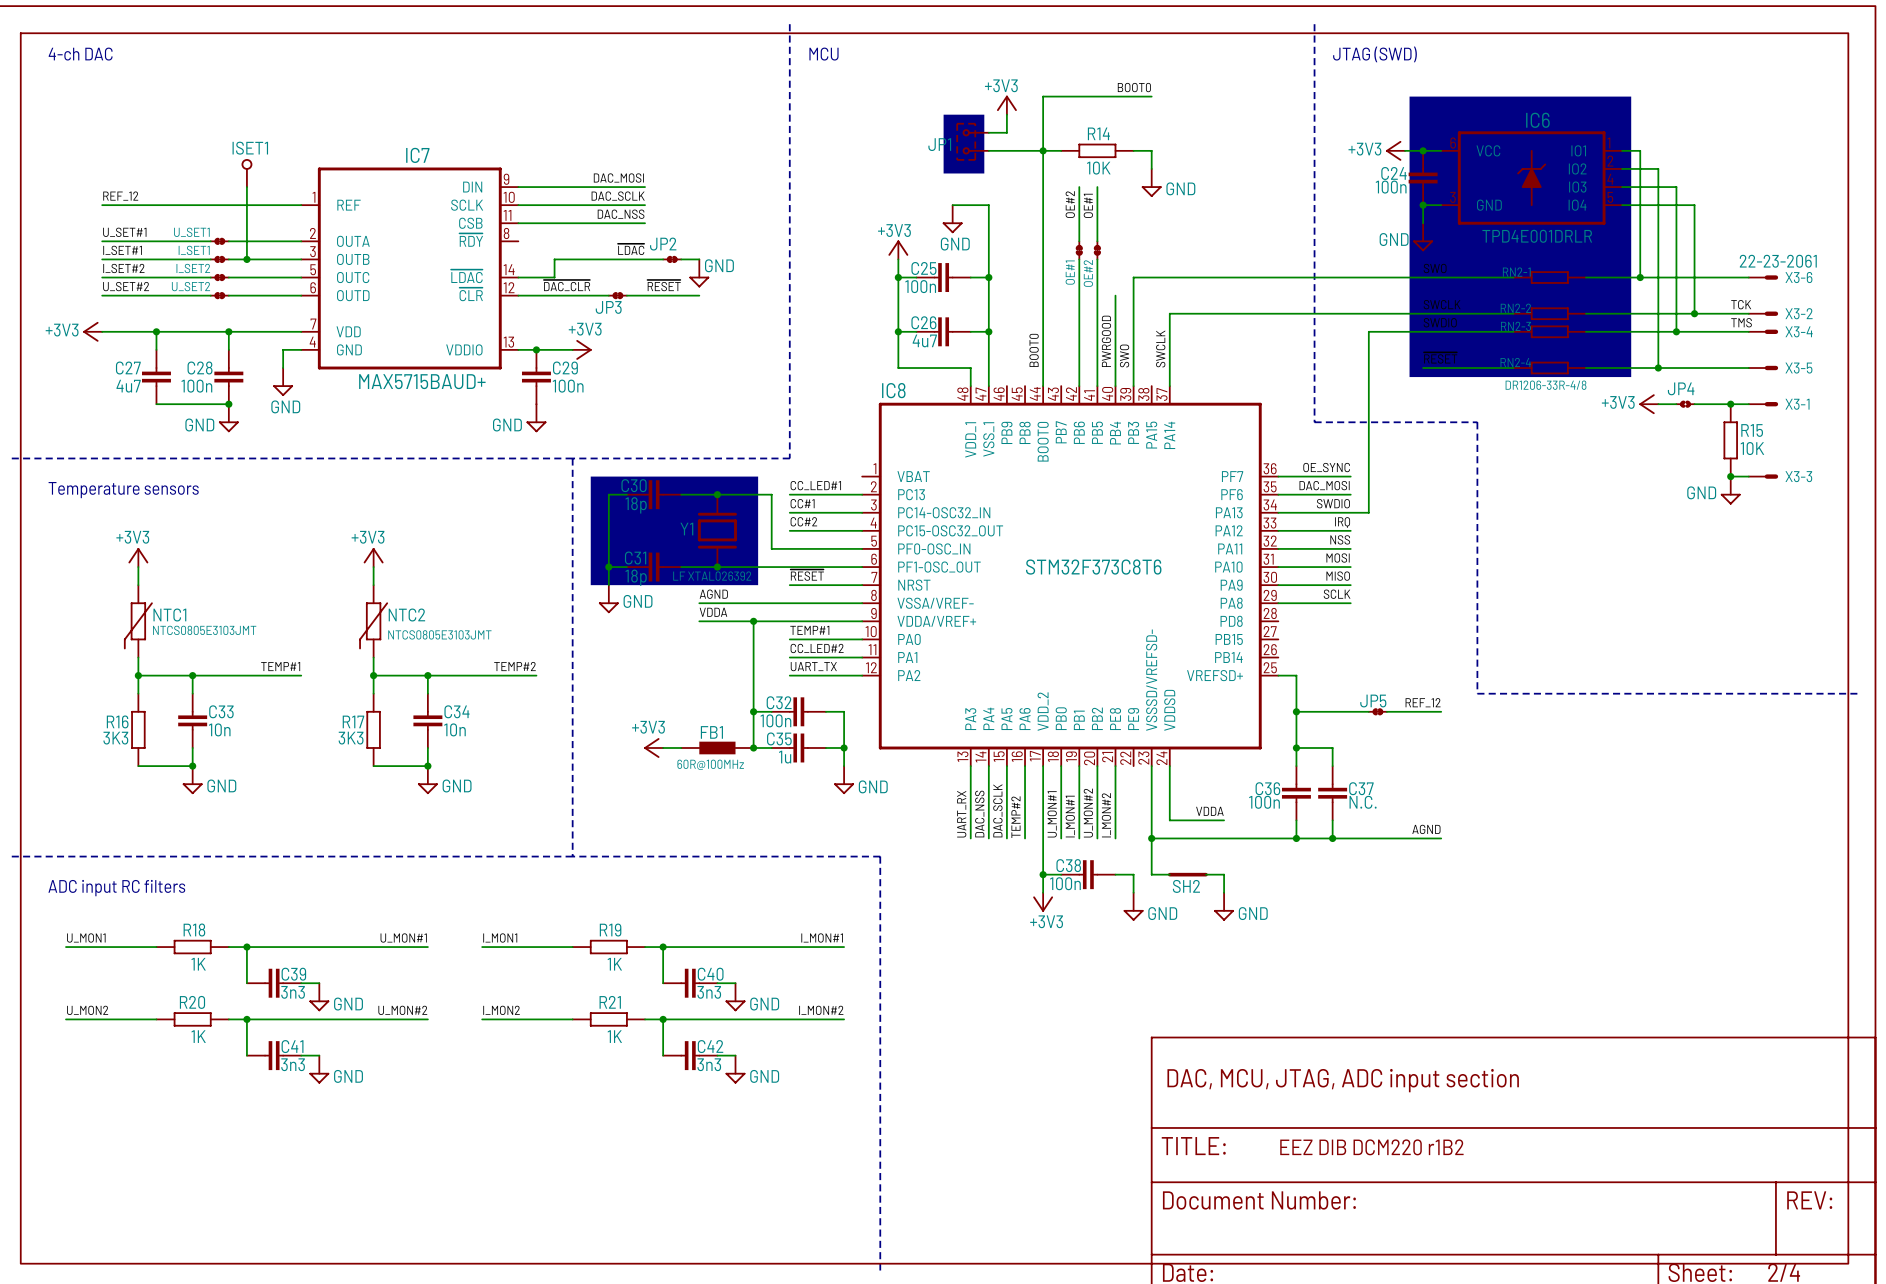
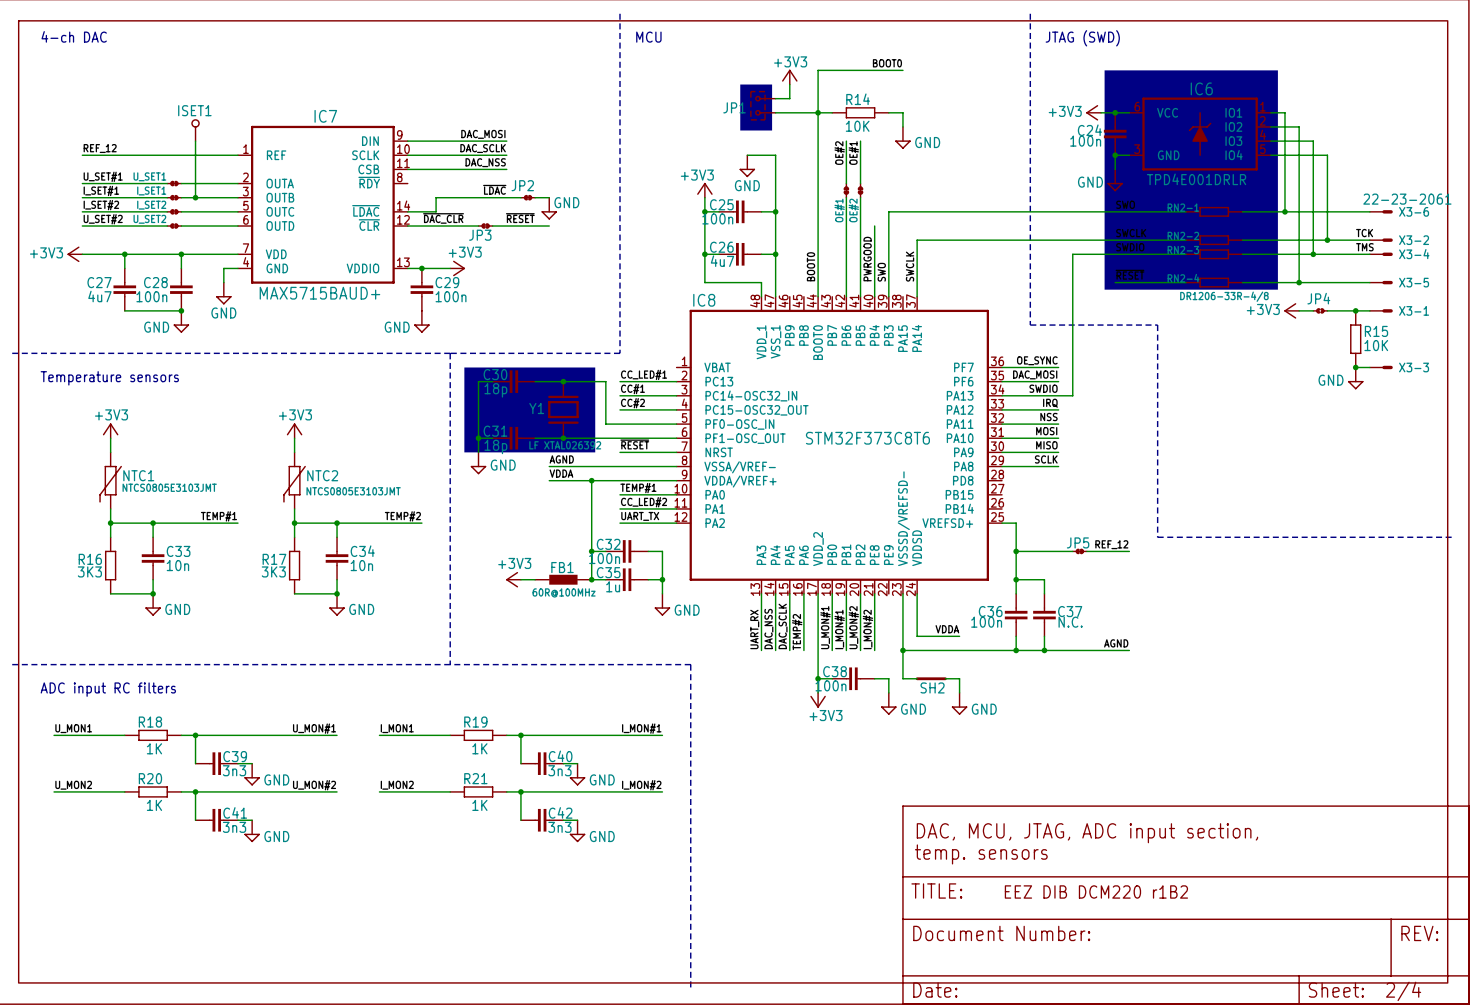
text: DAC, MCU, JTAG, ADC input section (1343, 1080) -> DAC, MCU, JTAG, ADC input section, (1087, 833)
text: none -> temp. sensors (981, 854)

